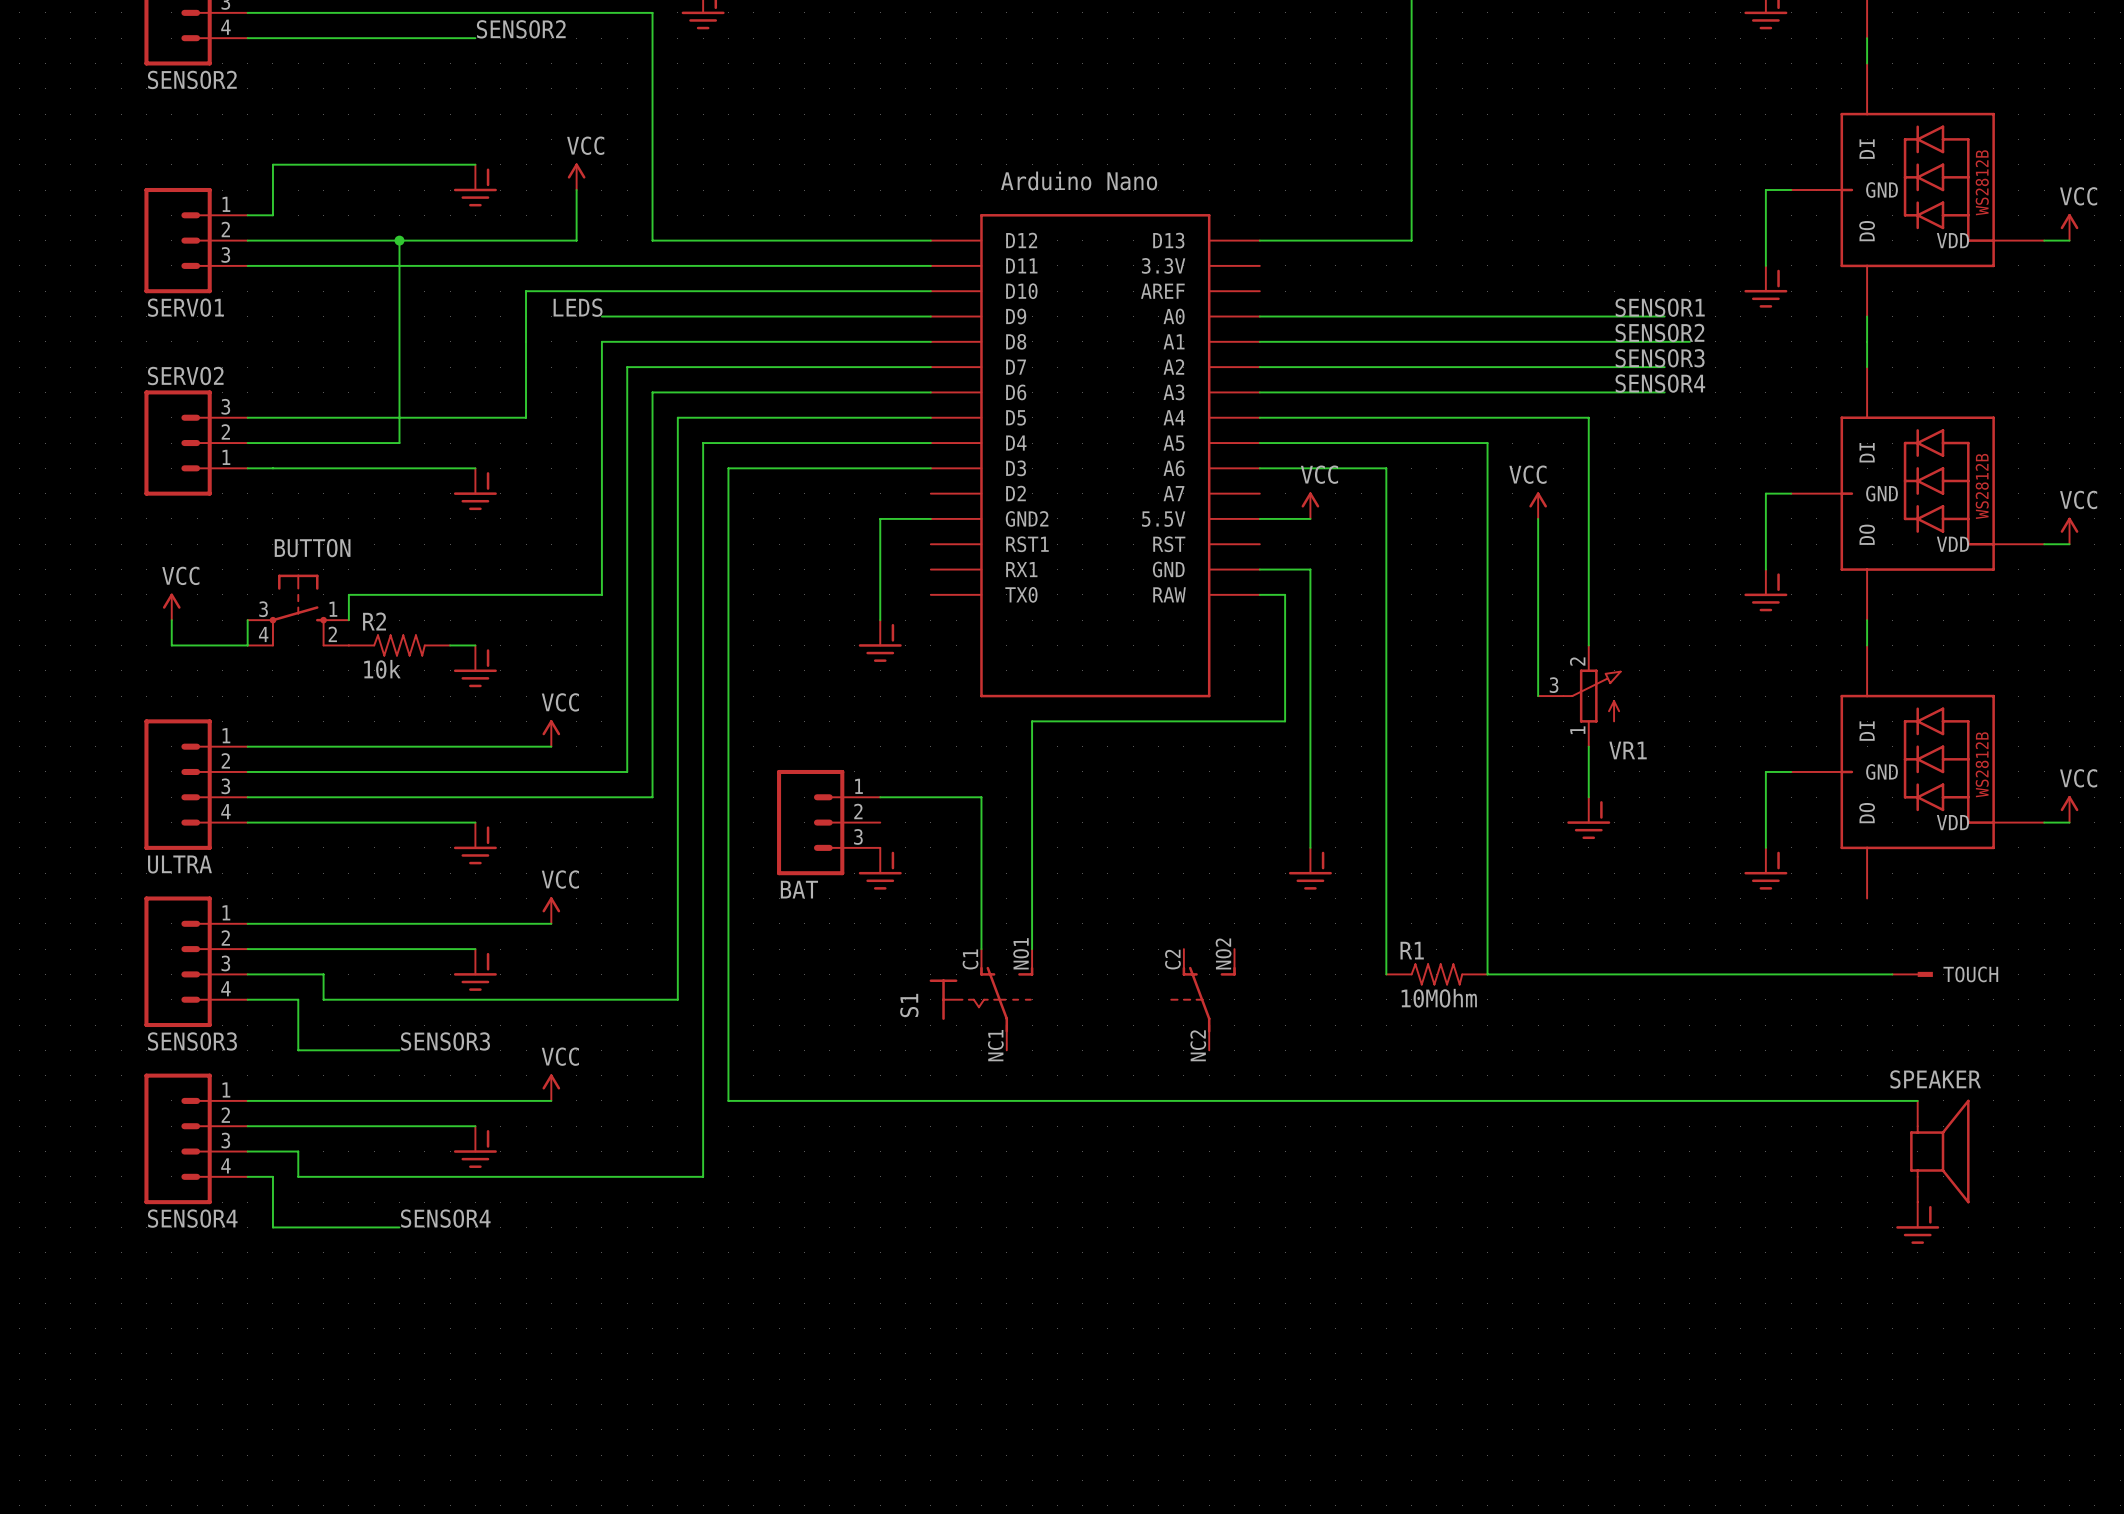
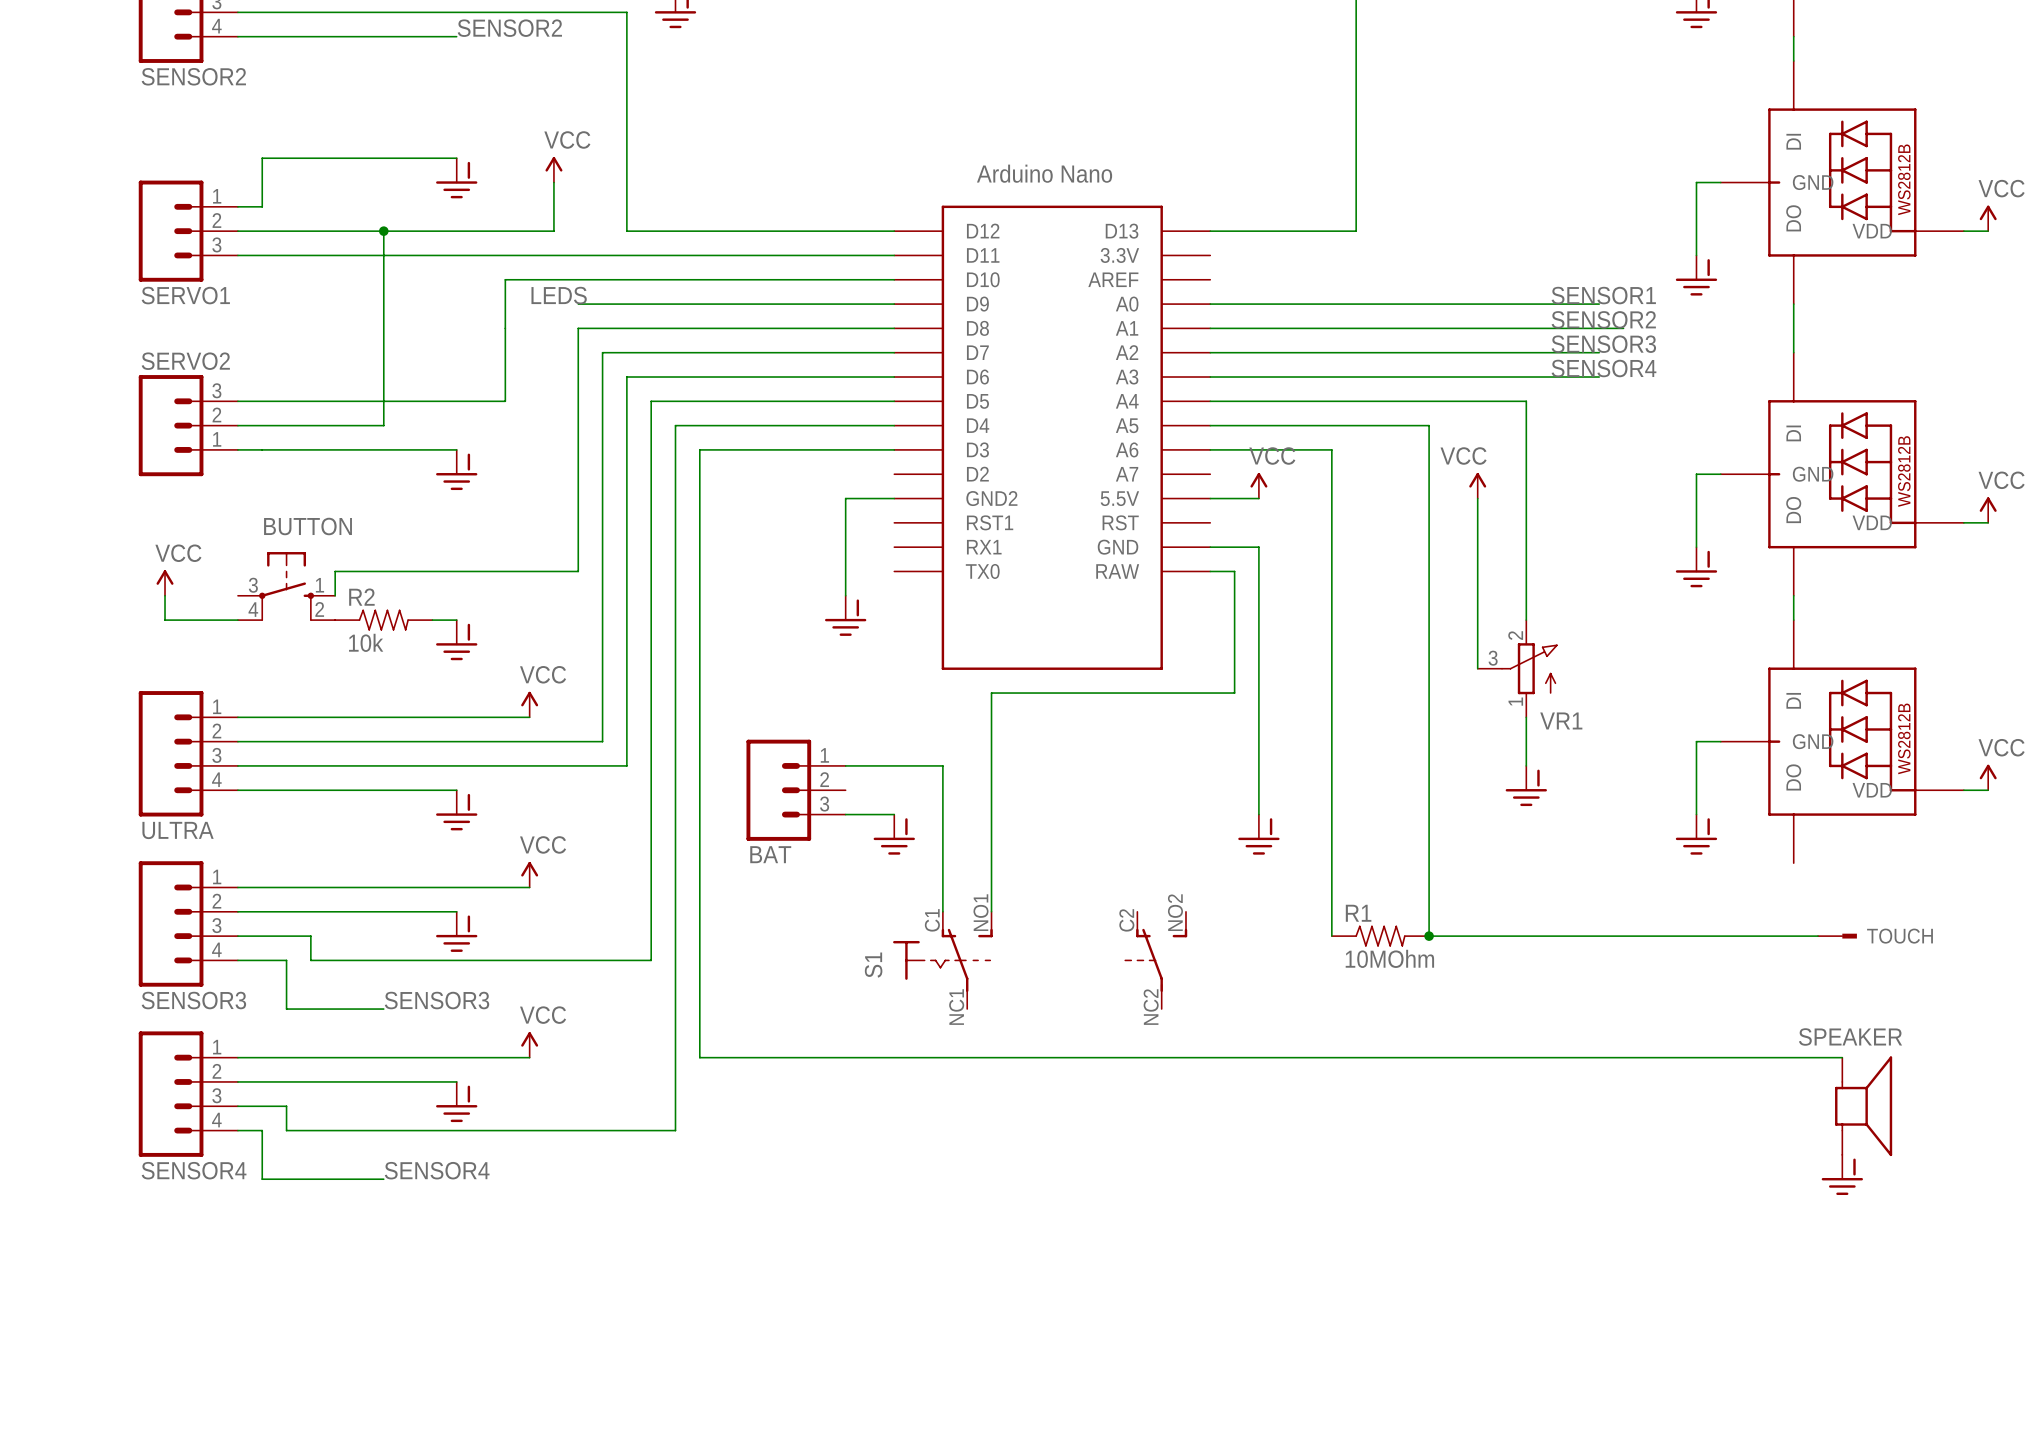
wire: (247, 620) (247, 645) -> none
wire: none -> (845, 814) (894, 814)
power symbol position: (880, 868) -> (894, 834)
junction: none -> (1429, 936)

